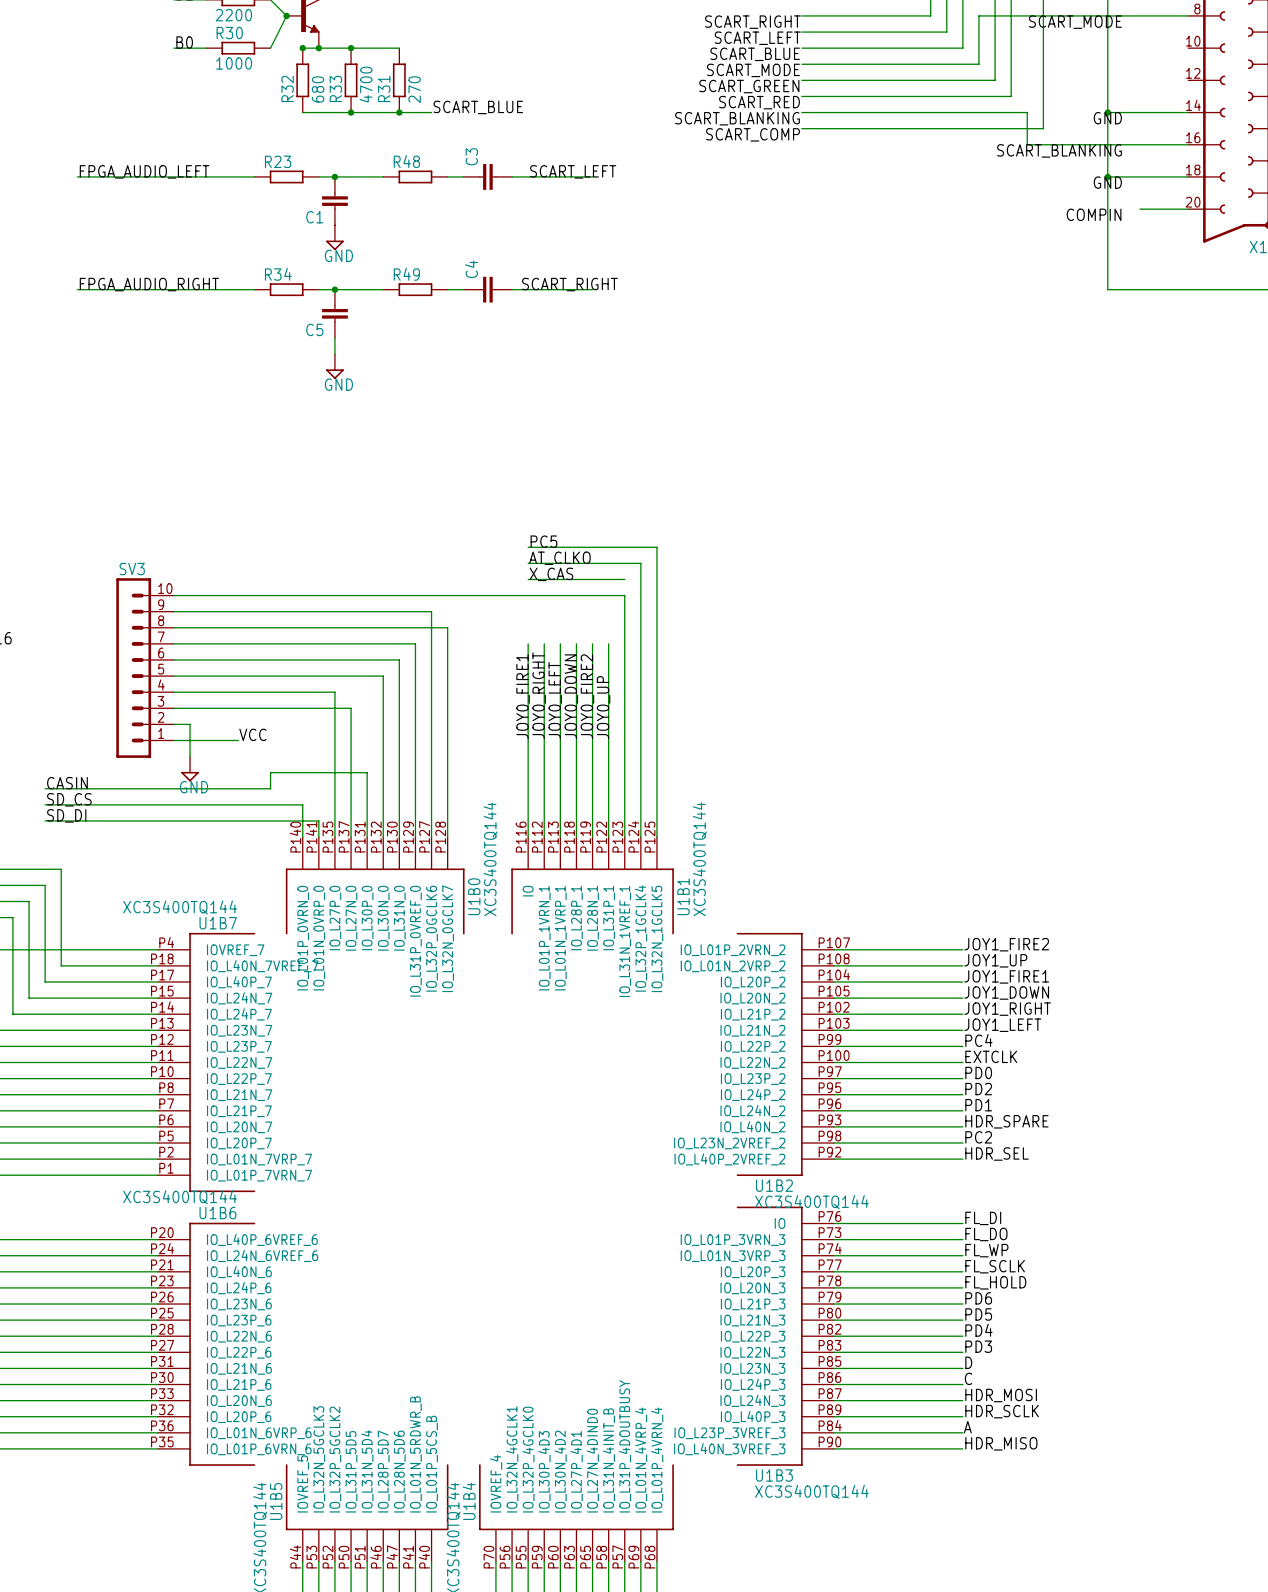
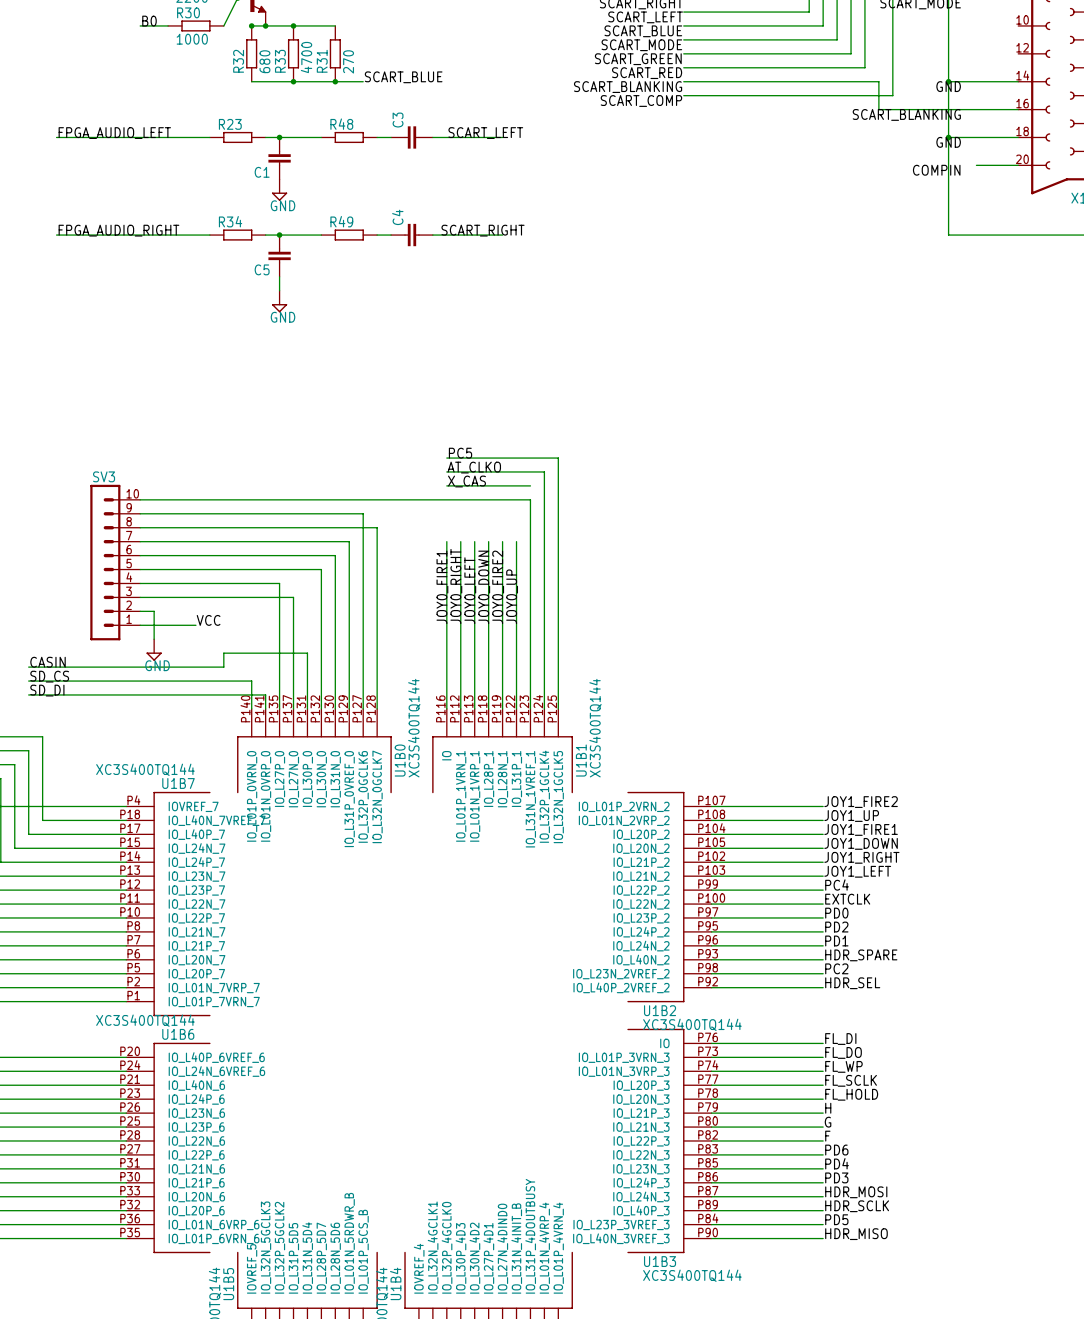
label: PD6 (978, 1298) -> H (828, 1108)
label: PD5 (978, 1314) -> G (828, 1122)
label: PD4 (978, 1330) -> F (827, 1136)
label: PD3 (978, 1346) -> PD6 (836, 1150)
label: D (968, 1362) -> PD4 (837, 1163)
label: C (968, 1378) -> PD3 (836, 1177)
label: A (967, 1427) -> PD5 (836, 1219)

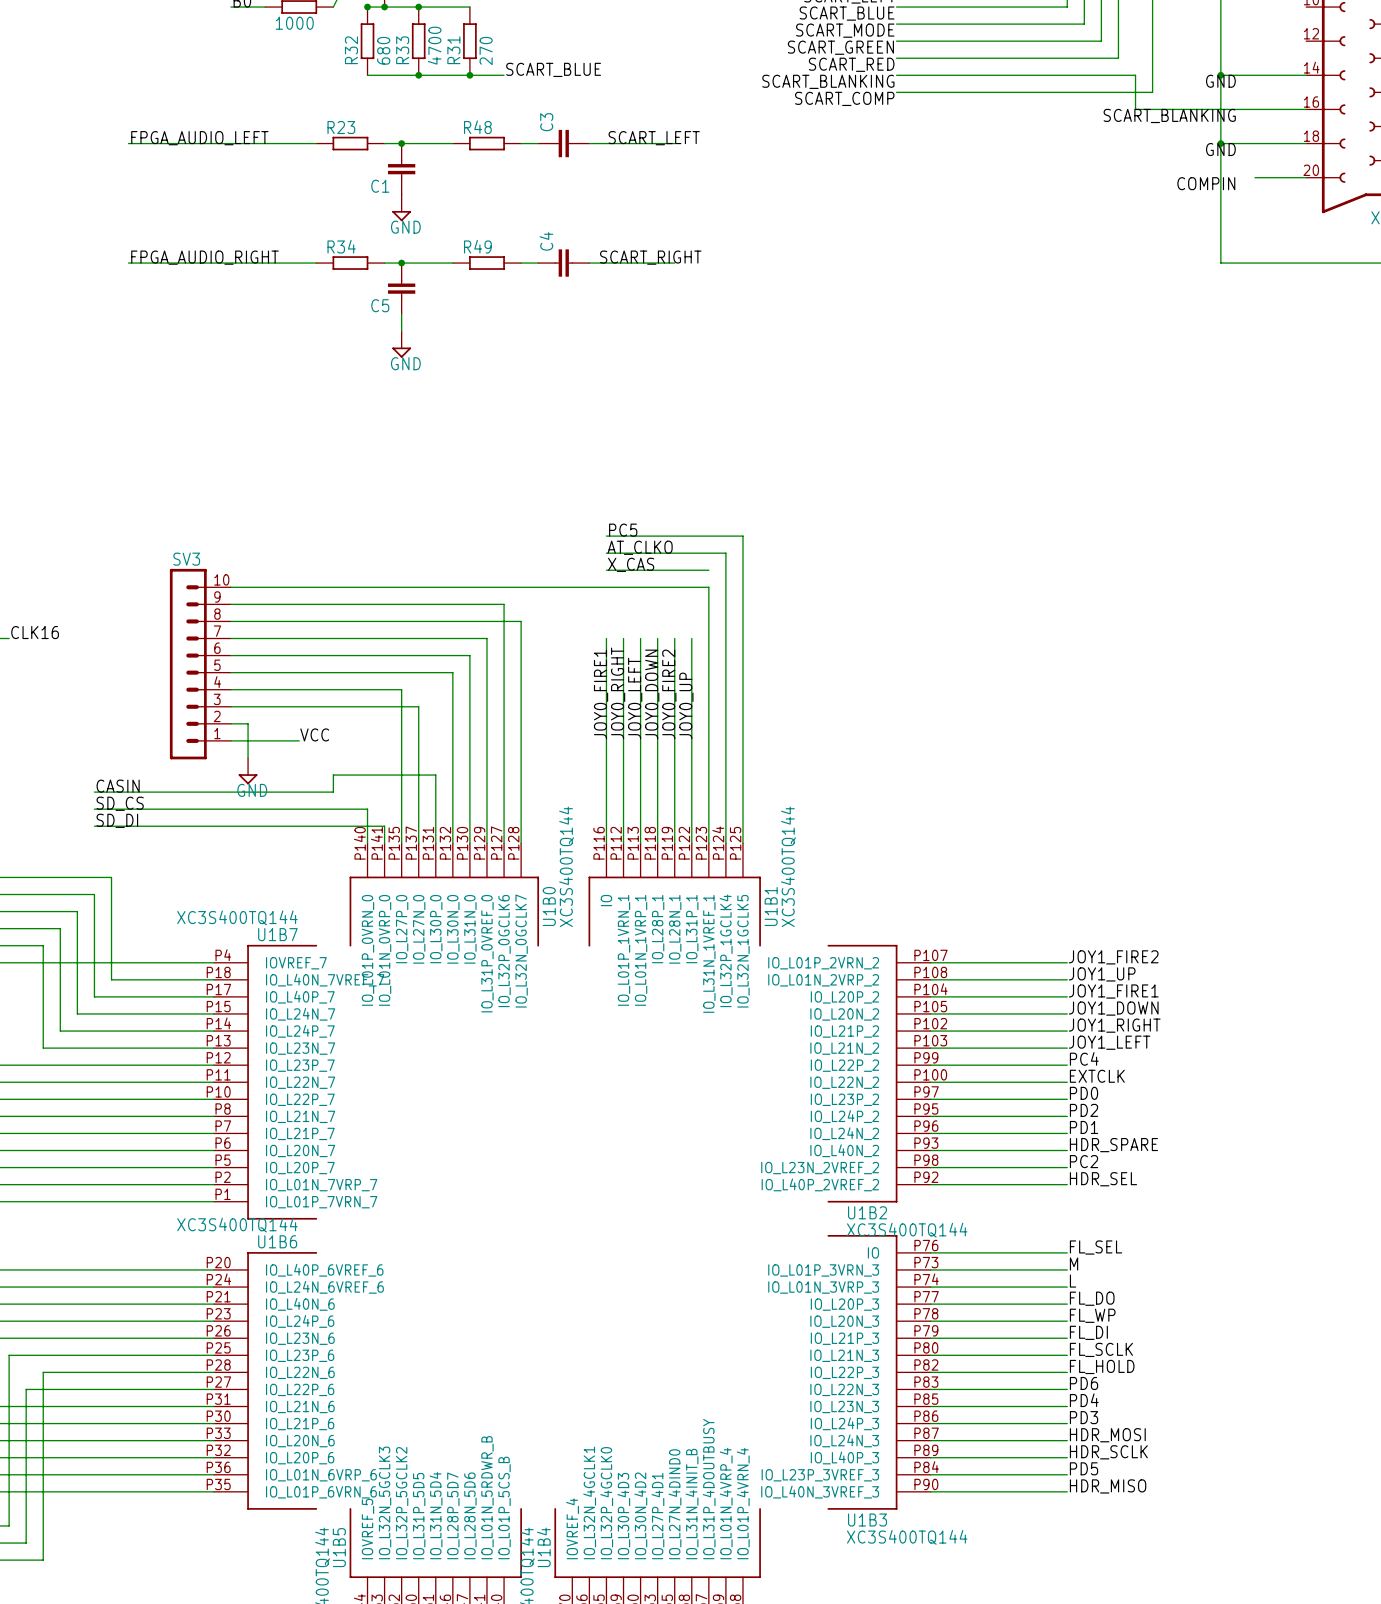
label: FL_DI (840, 1039) -> FL_SEL (1096, 1247)
label: FL_DO (843, 1052) -> M (1074, 1264)
label: FL_WP (843, 1066) -> L (1073, 1281)
label: FL_SCLK (851, 1080) -> FL_DO (1092, 1298)
label: FL_HOLD (851, 1094) -> FL_WP (1092, 1315)
label: H (828, 1108) -> FL_DI (1088, 1332)
label: G (828, 1122) -> FL_SCLK (1101, 1349)
label: F (827, 1136) -> FL_HOLD (1102, 1366)

